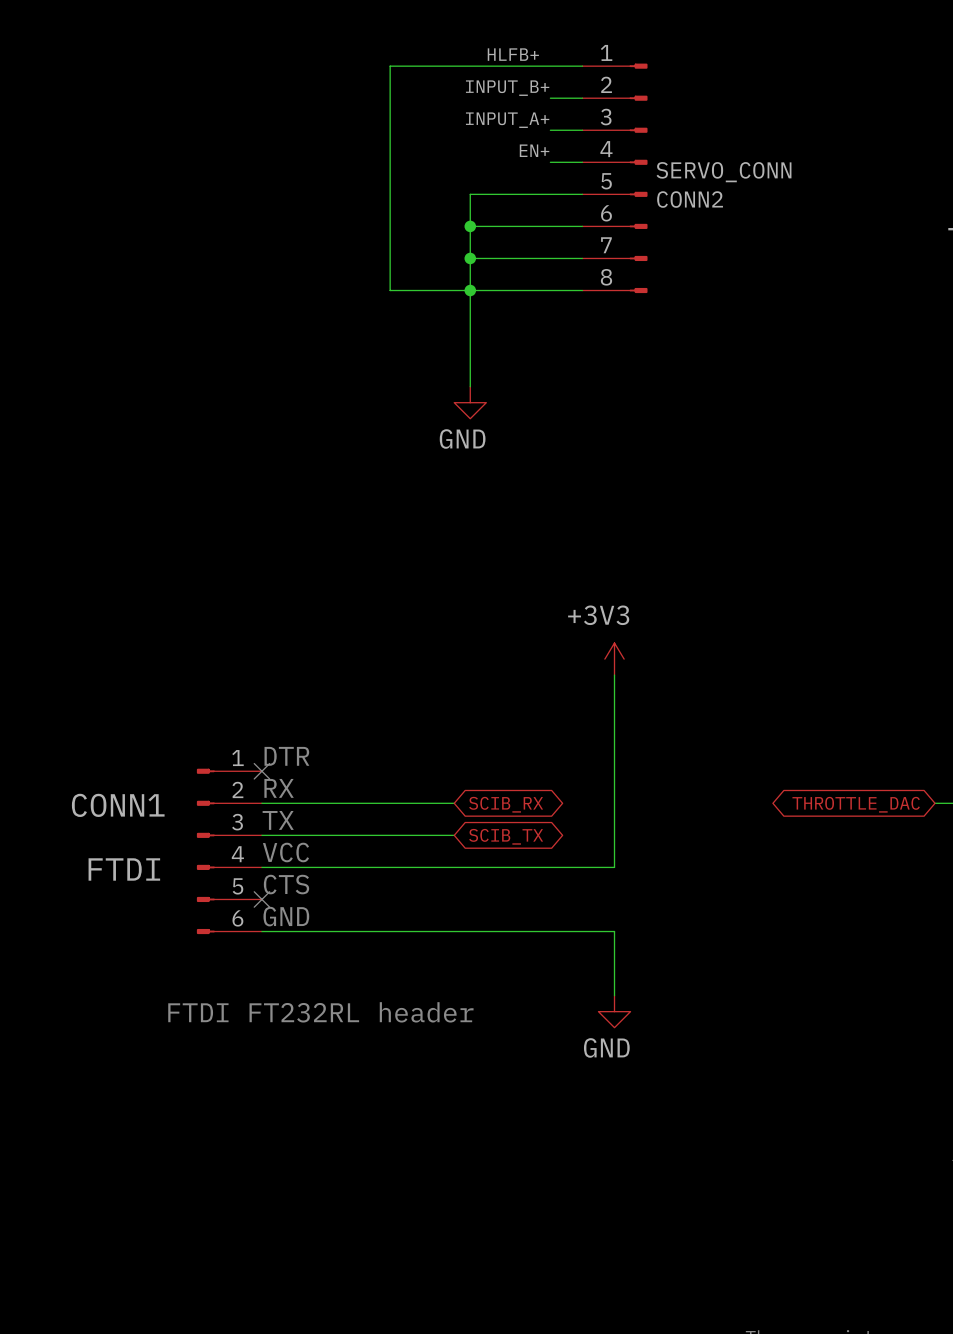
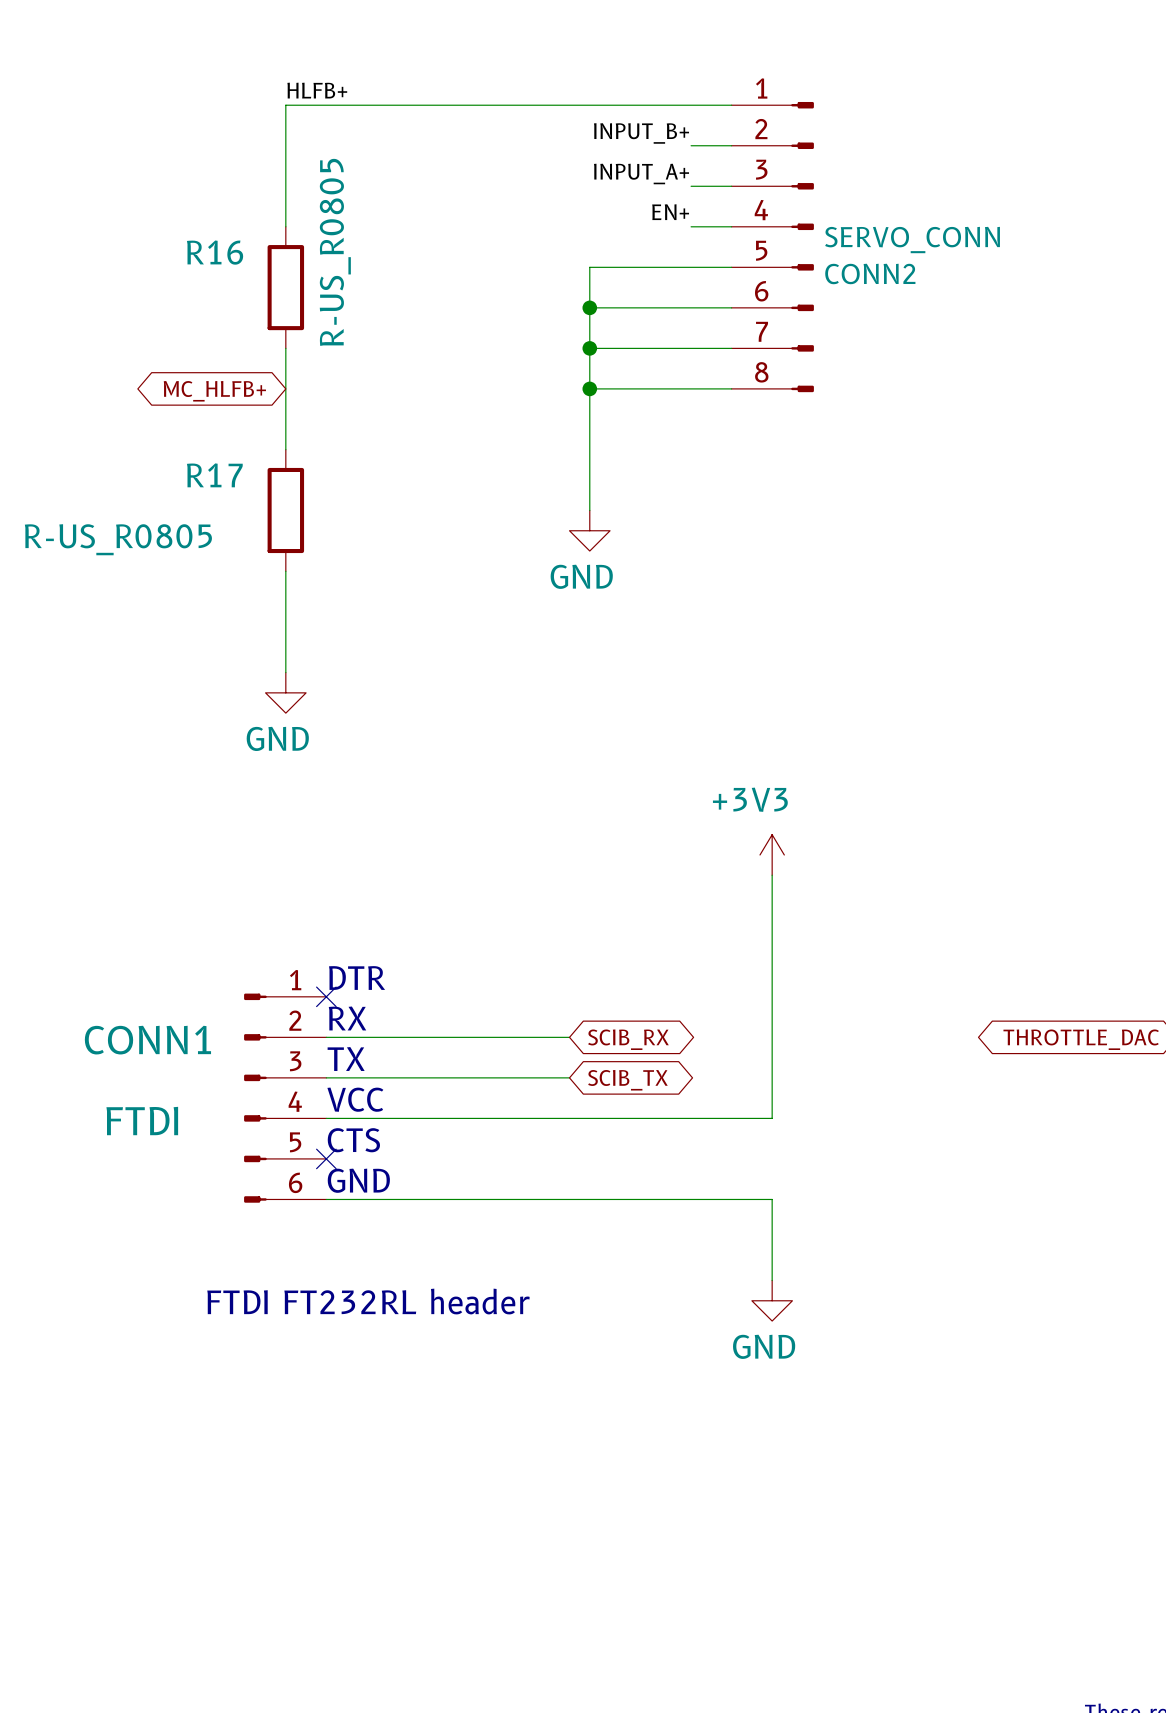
label position: HLFB+ (513, 54) -> HLFB+ (317, 90)
wire: (390, 66) (390, 290) (470, 290) -> (488, 105) (285, 105) (285, 226)
R16: none -> R-US_R0805 (285, 287)
wire: none -> (285, 348) (285, 449)
global label: none -> MC_HLFB+ (214, 391)
R17: none -> R-US_R0805 (285, 510)
wire: none -> (285, 571) (285, 672)
power symbol: none -> GND (285, 692)

